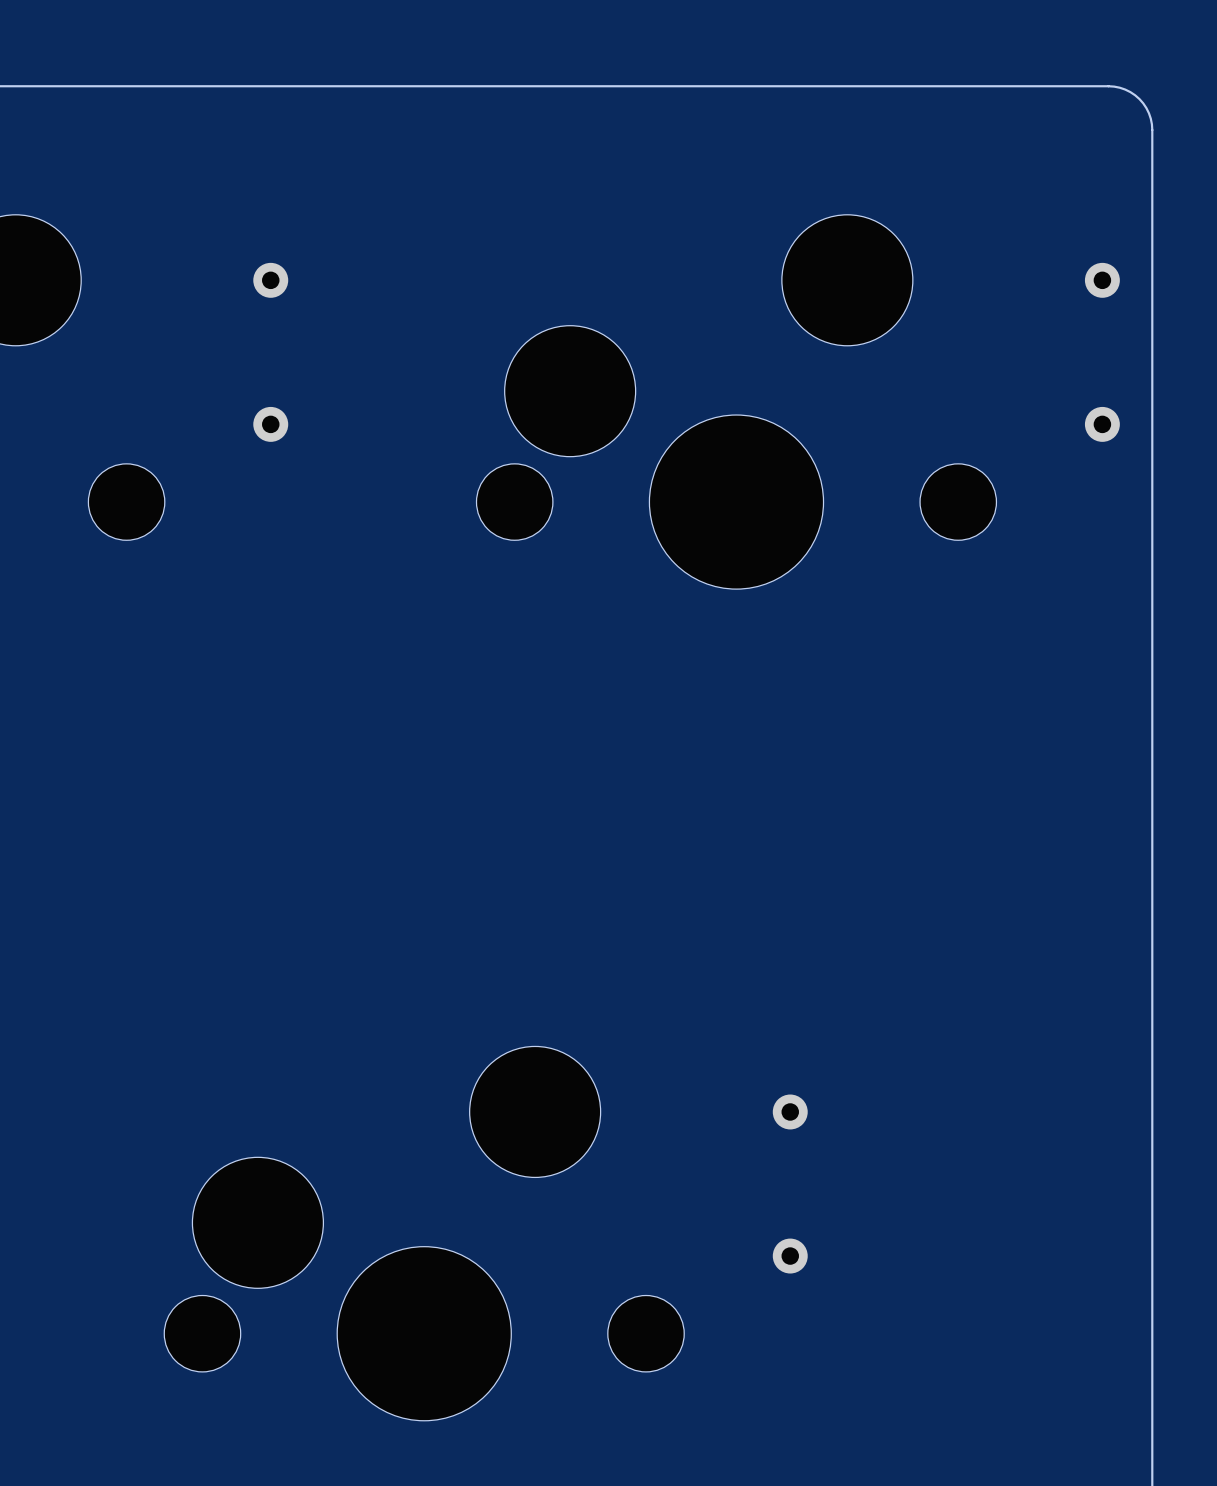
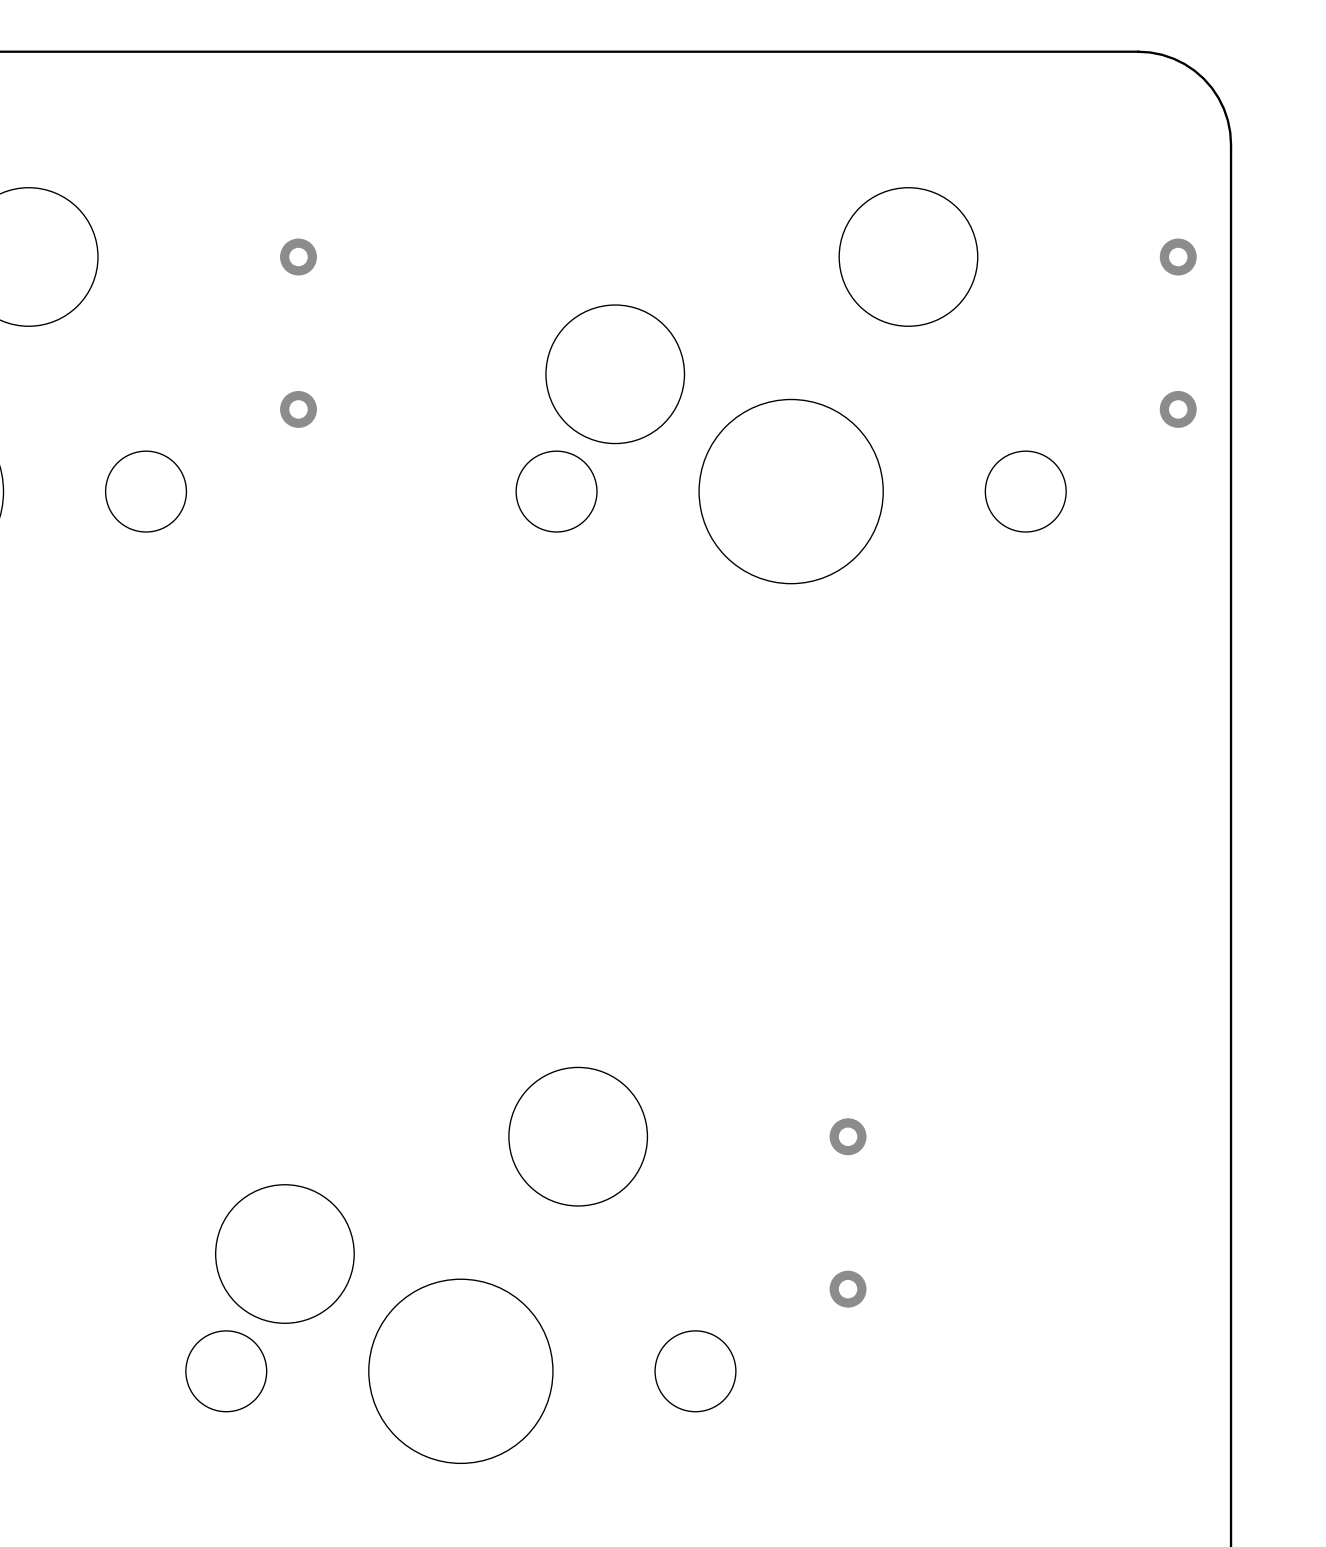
board edge: (1064, 86) (1108, 86) -> none
board edge: (1108, 86) (1130, 92) (1146, 108) (1151, 124) (1152, 173) -> (1138, 51) (1162, 54) (1173, 58) (1184, 64) (1203, 78) (1211, 87) (1223, 108) (1227, 120) (1231, 144)

